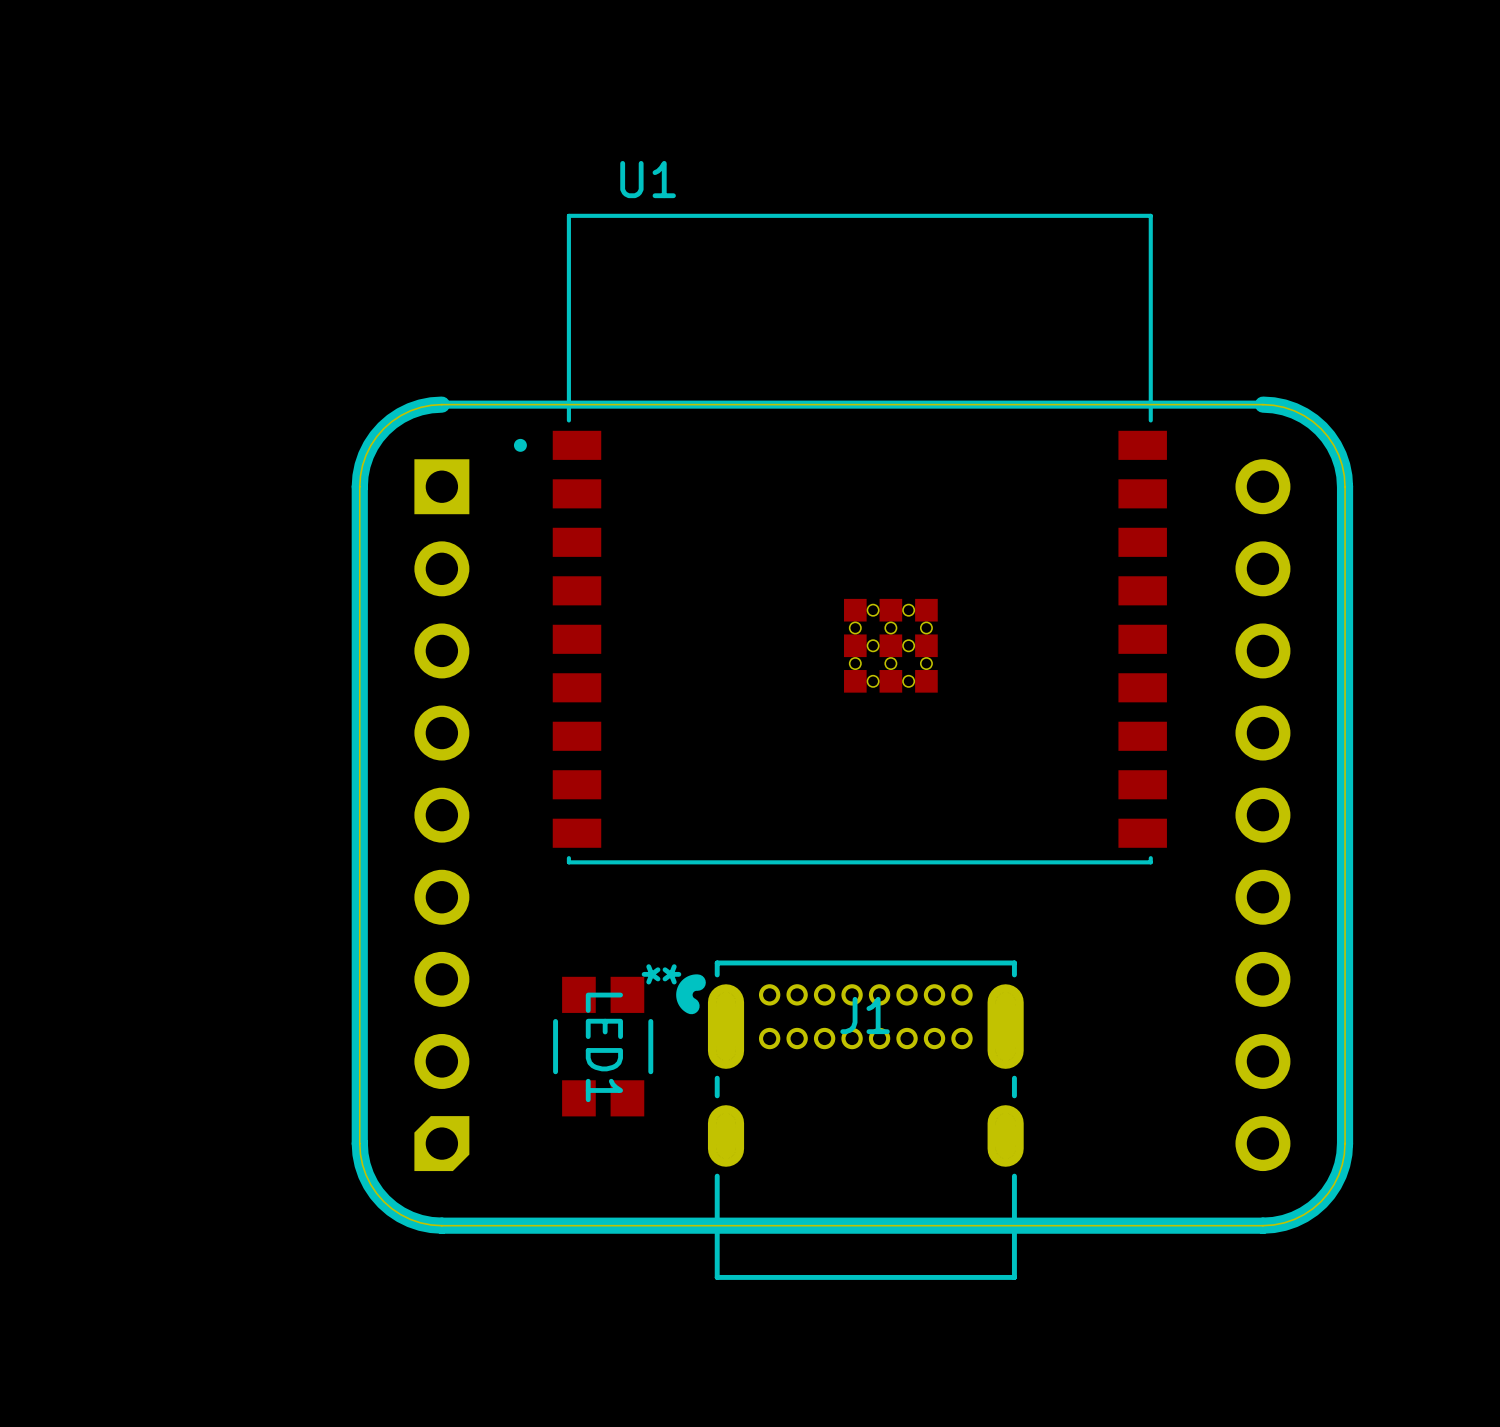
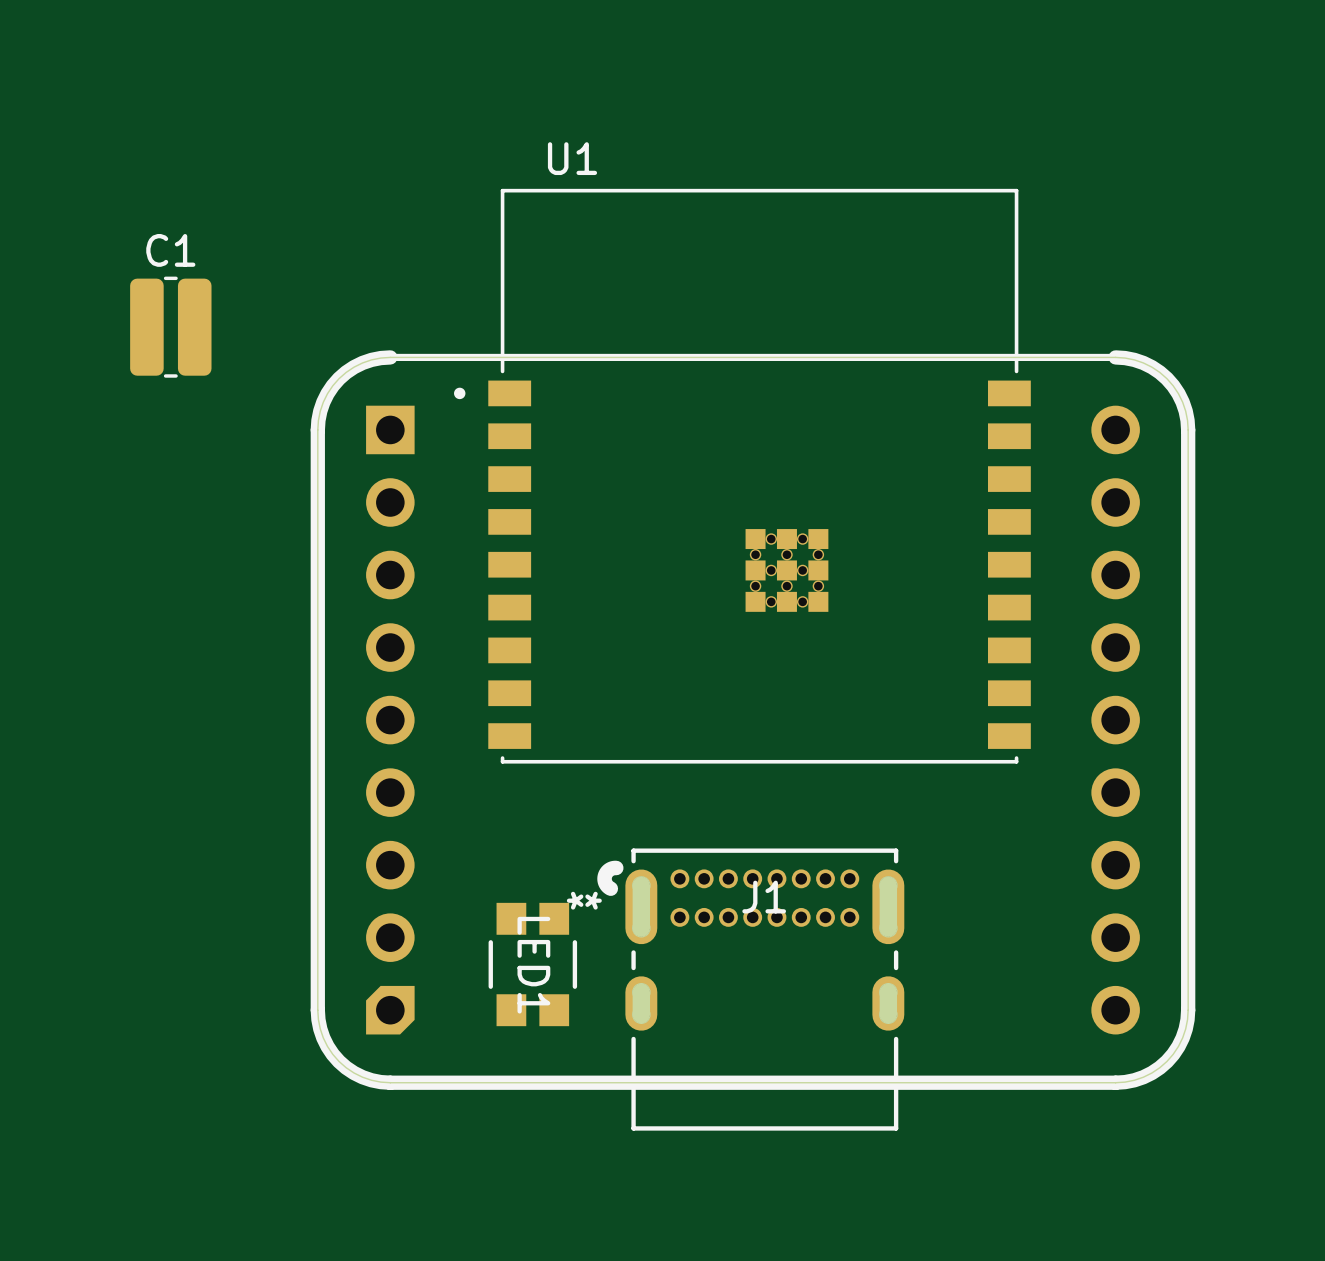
C1: none -> (170, 327)
LED1 position: (603, 1046) -> (532, 964)

